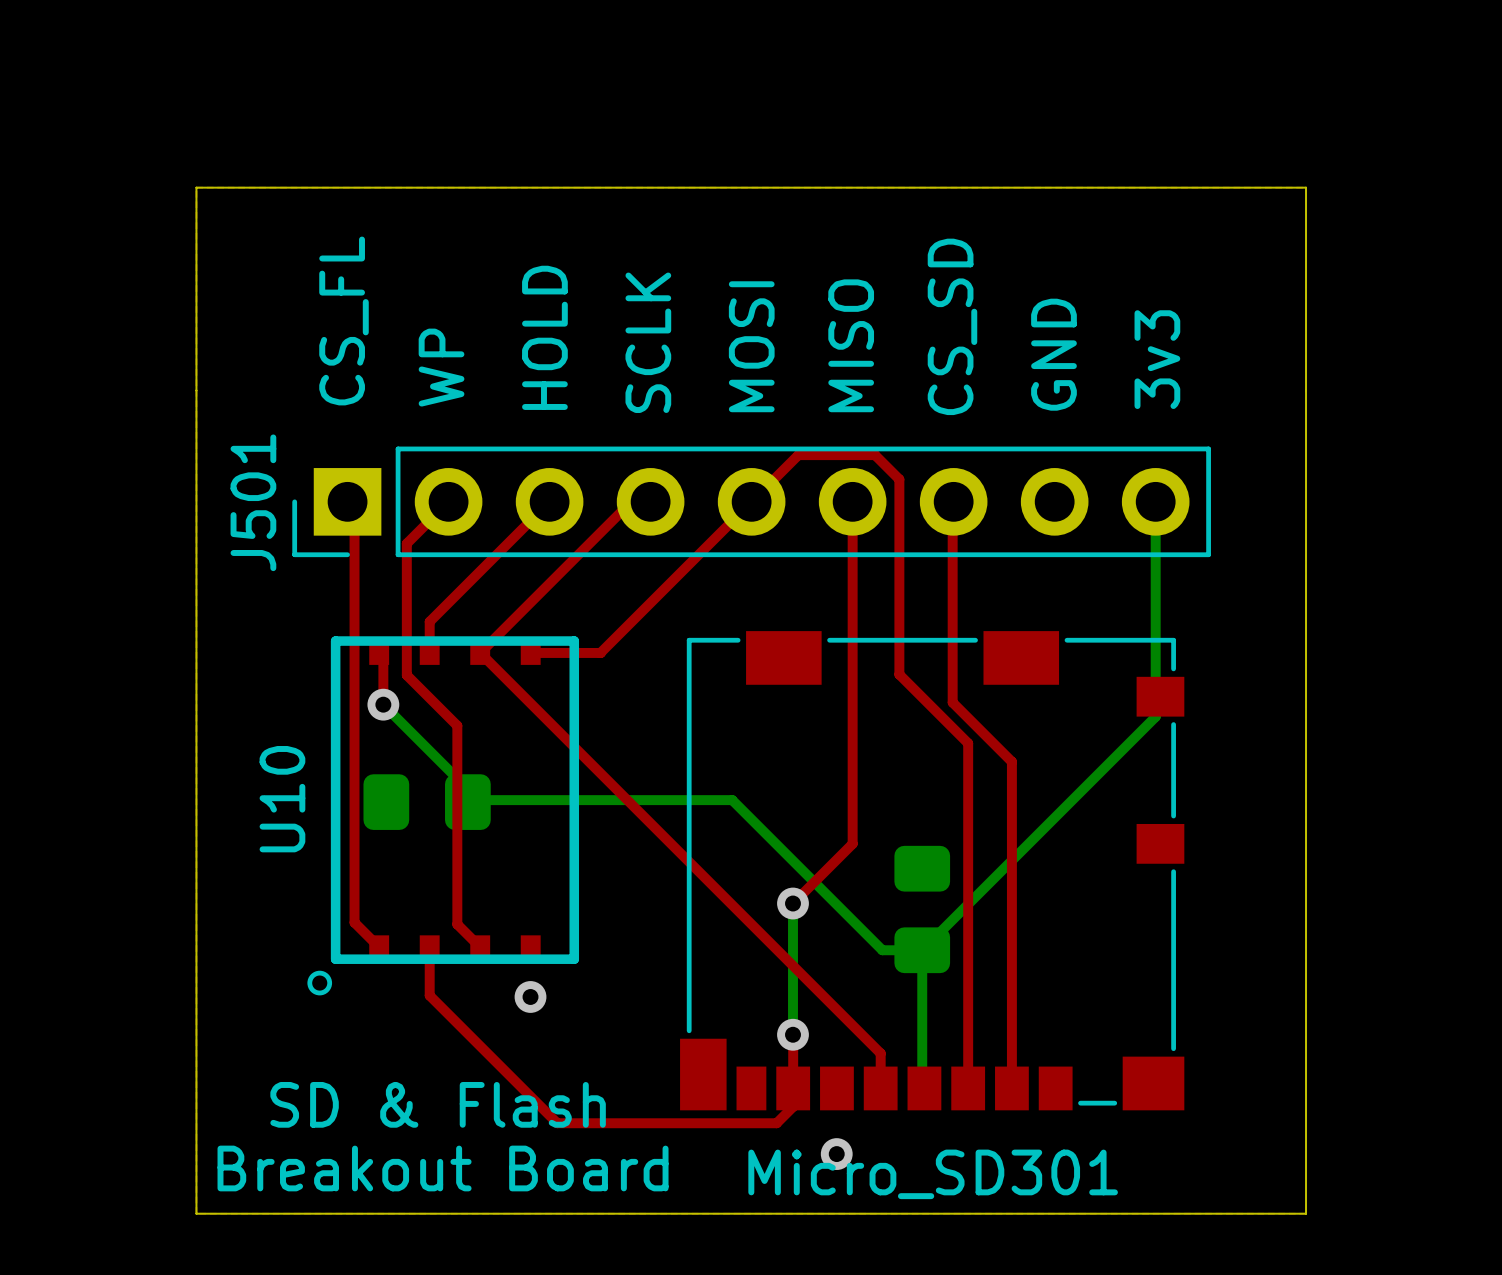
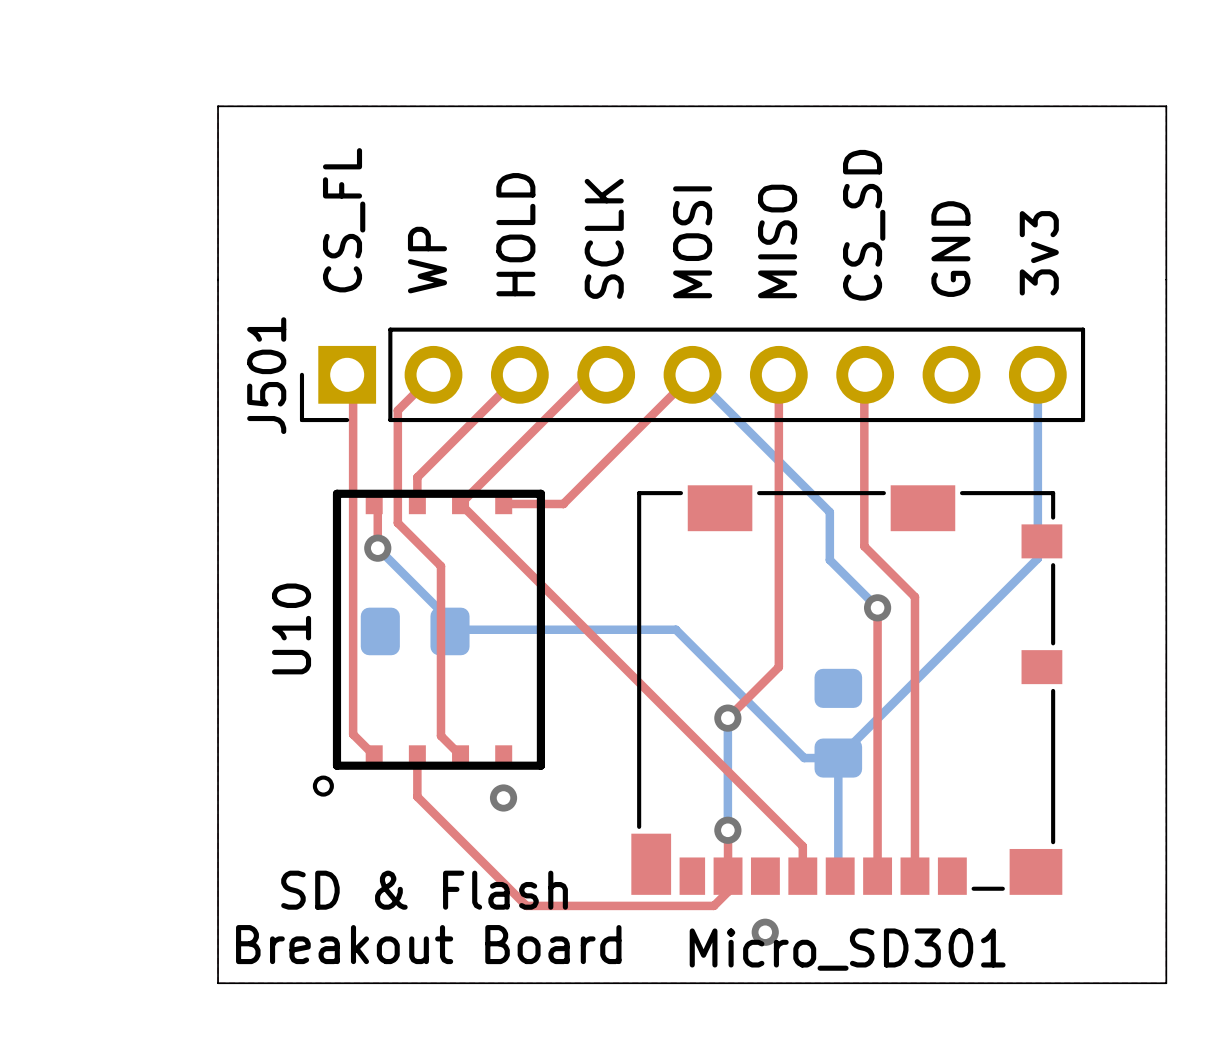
top track: (751, 501) (798, 455) (875, 455) (899, 479) (899, 674) (968, 743) (968, 774) -> none
bottom track: none -> (692, 374) (829, 512) (829, 560) (877, 607)
via: none -> (877, 607)

